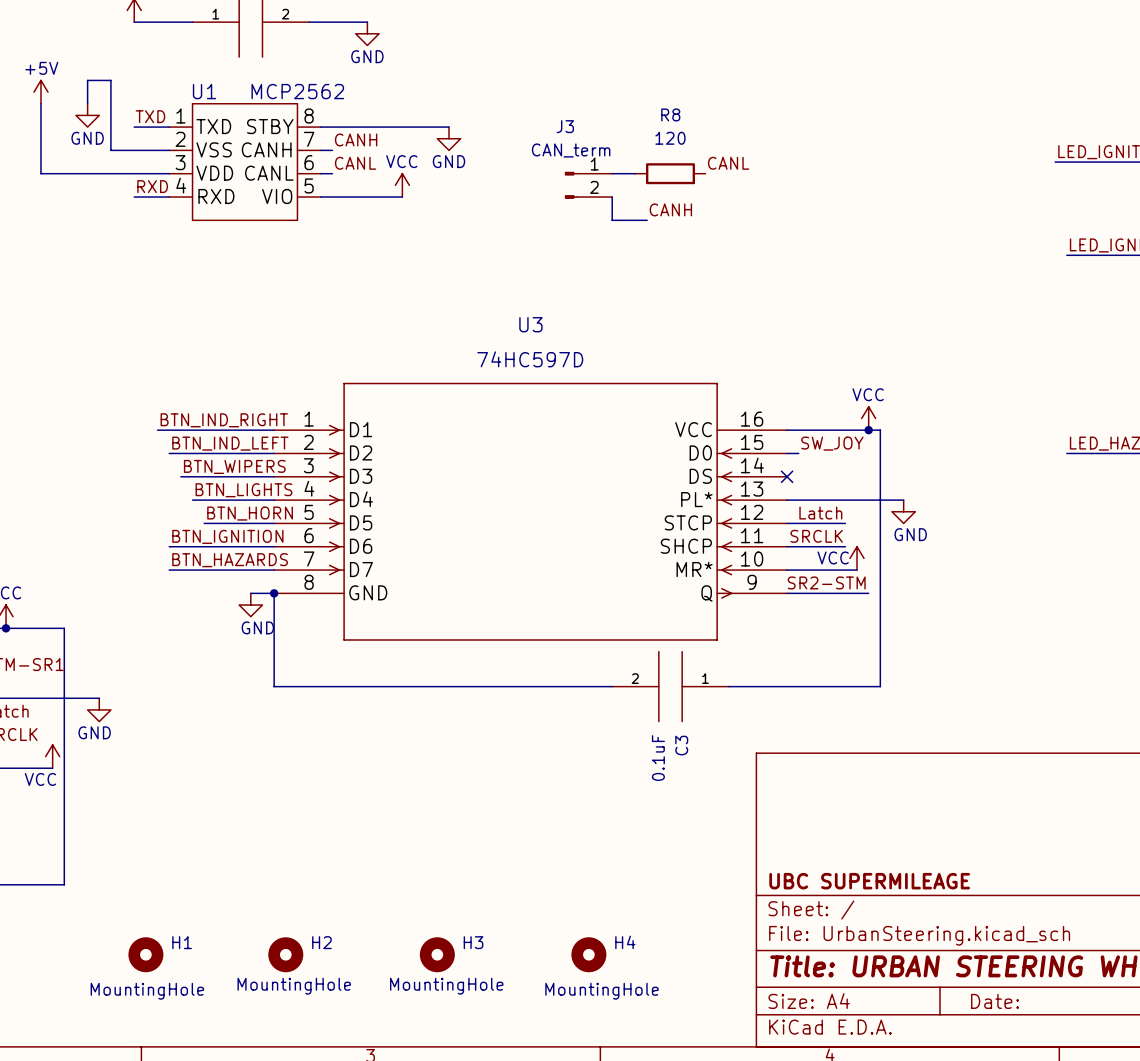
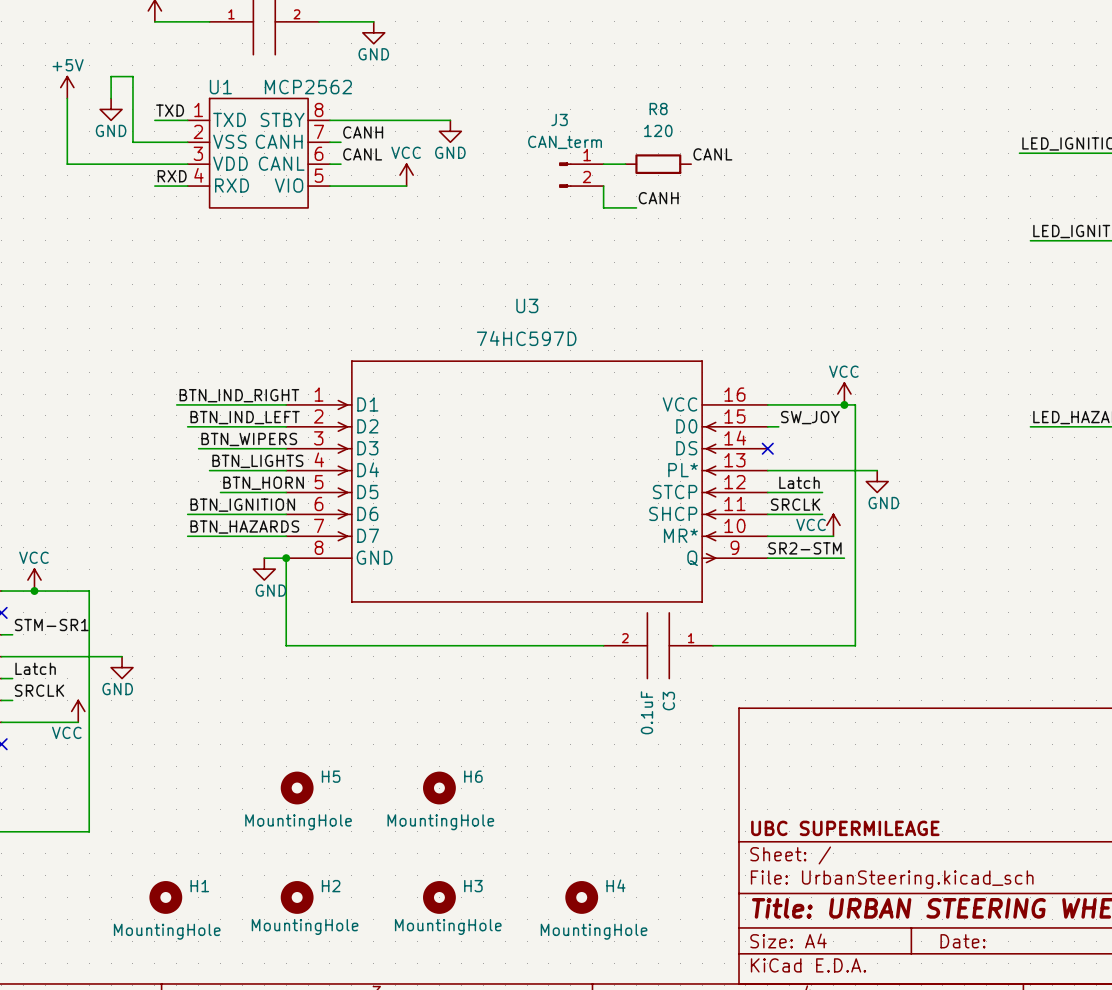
H5: none -> MountingHole (297, 788)
H6: none -> MountingHole (439, 788)

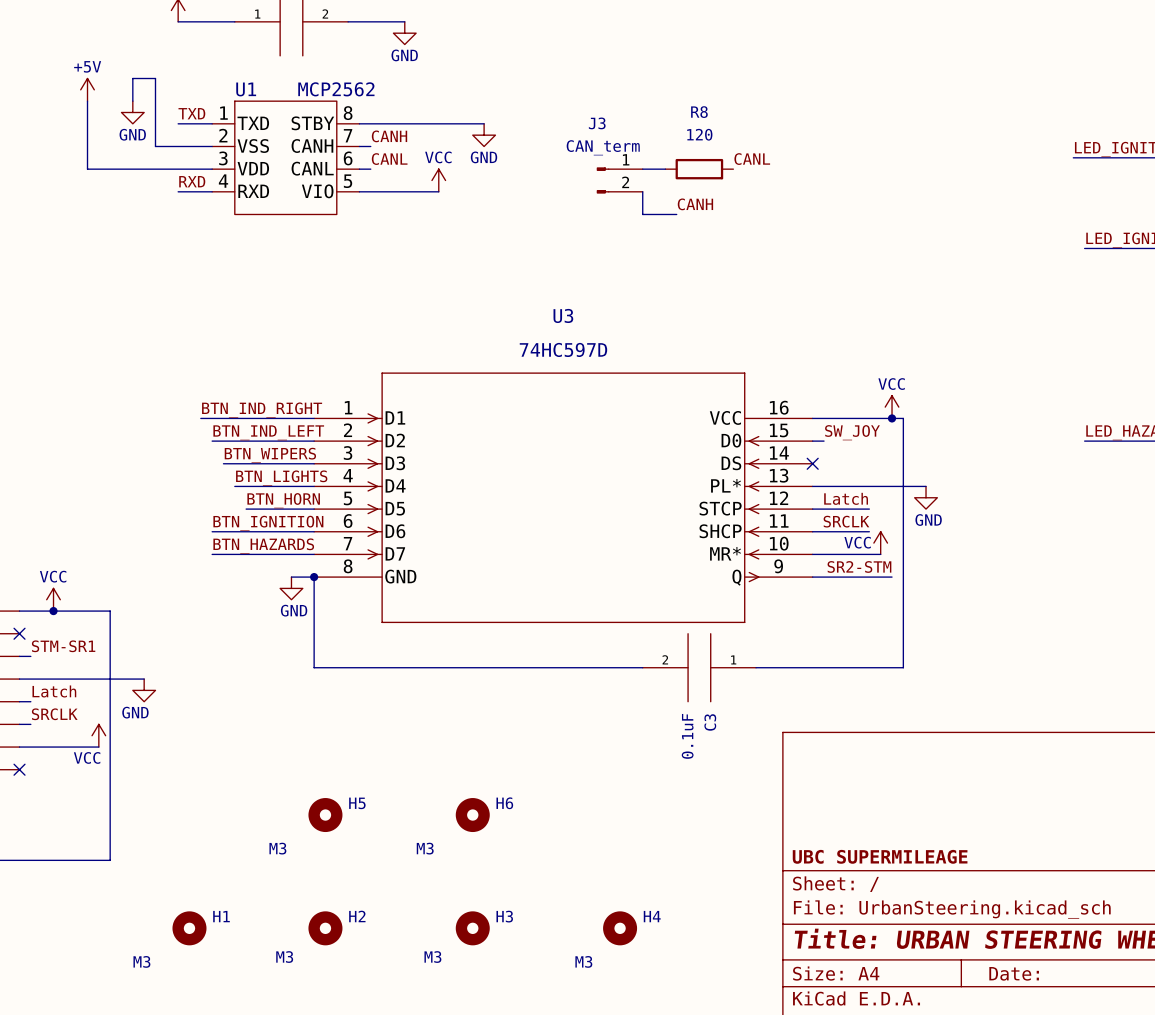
H5 value: MountingHole (298, 822) -> M3 (277, 848)
H6 value: MountingHole (440, 822) -> M3 (425, 848)
H2 value: MountingHole (305, 926) -> M3 (284, 957)
H3 value: MountingHole (448, 926) -> M3 (432, 957)
H1 value: MountingHole (167, 931) -> M3 (141, 961)
H4 value: MountingHole (594, 931) -> M3 (583, 961)

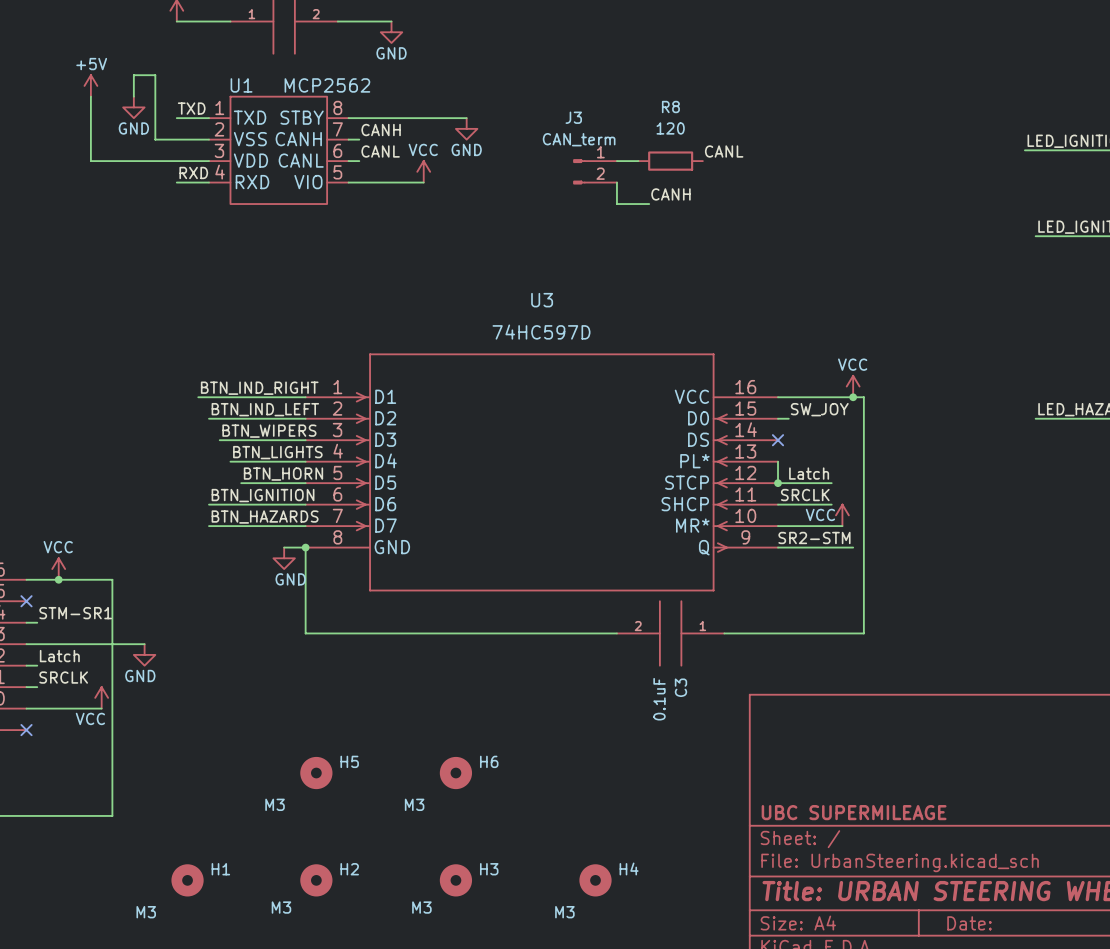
wire: (812, 486) (926, 486) -> (778, 461) (778, 483)
power symbol: GND (926, 497) -> none
junction: none -> (778, 483)

